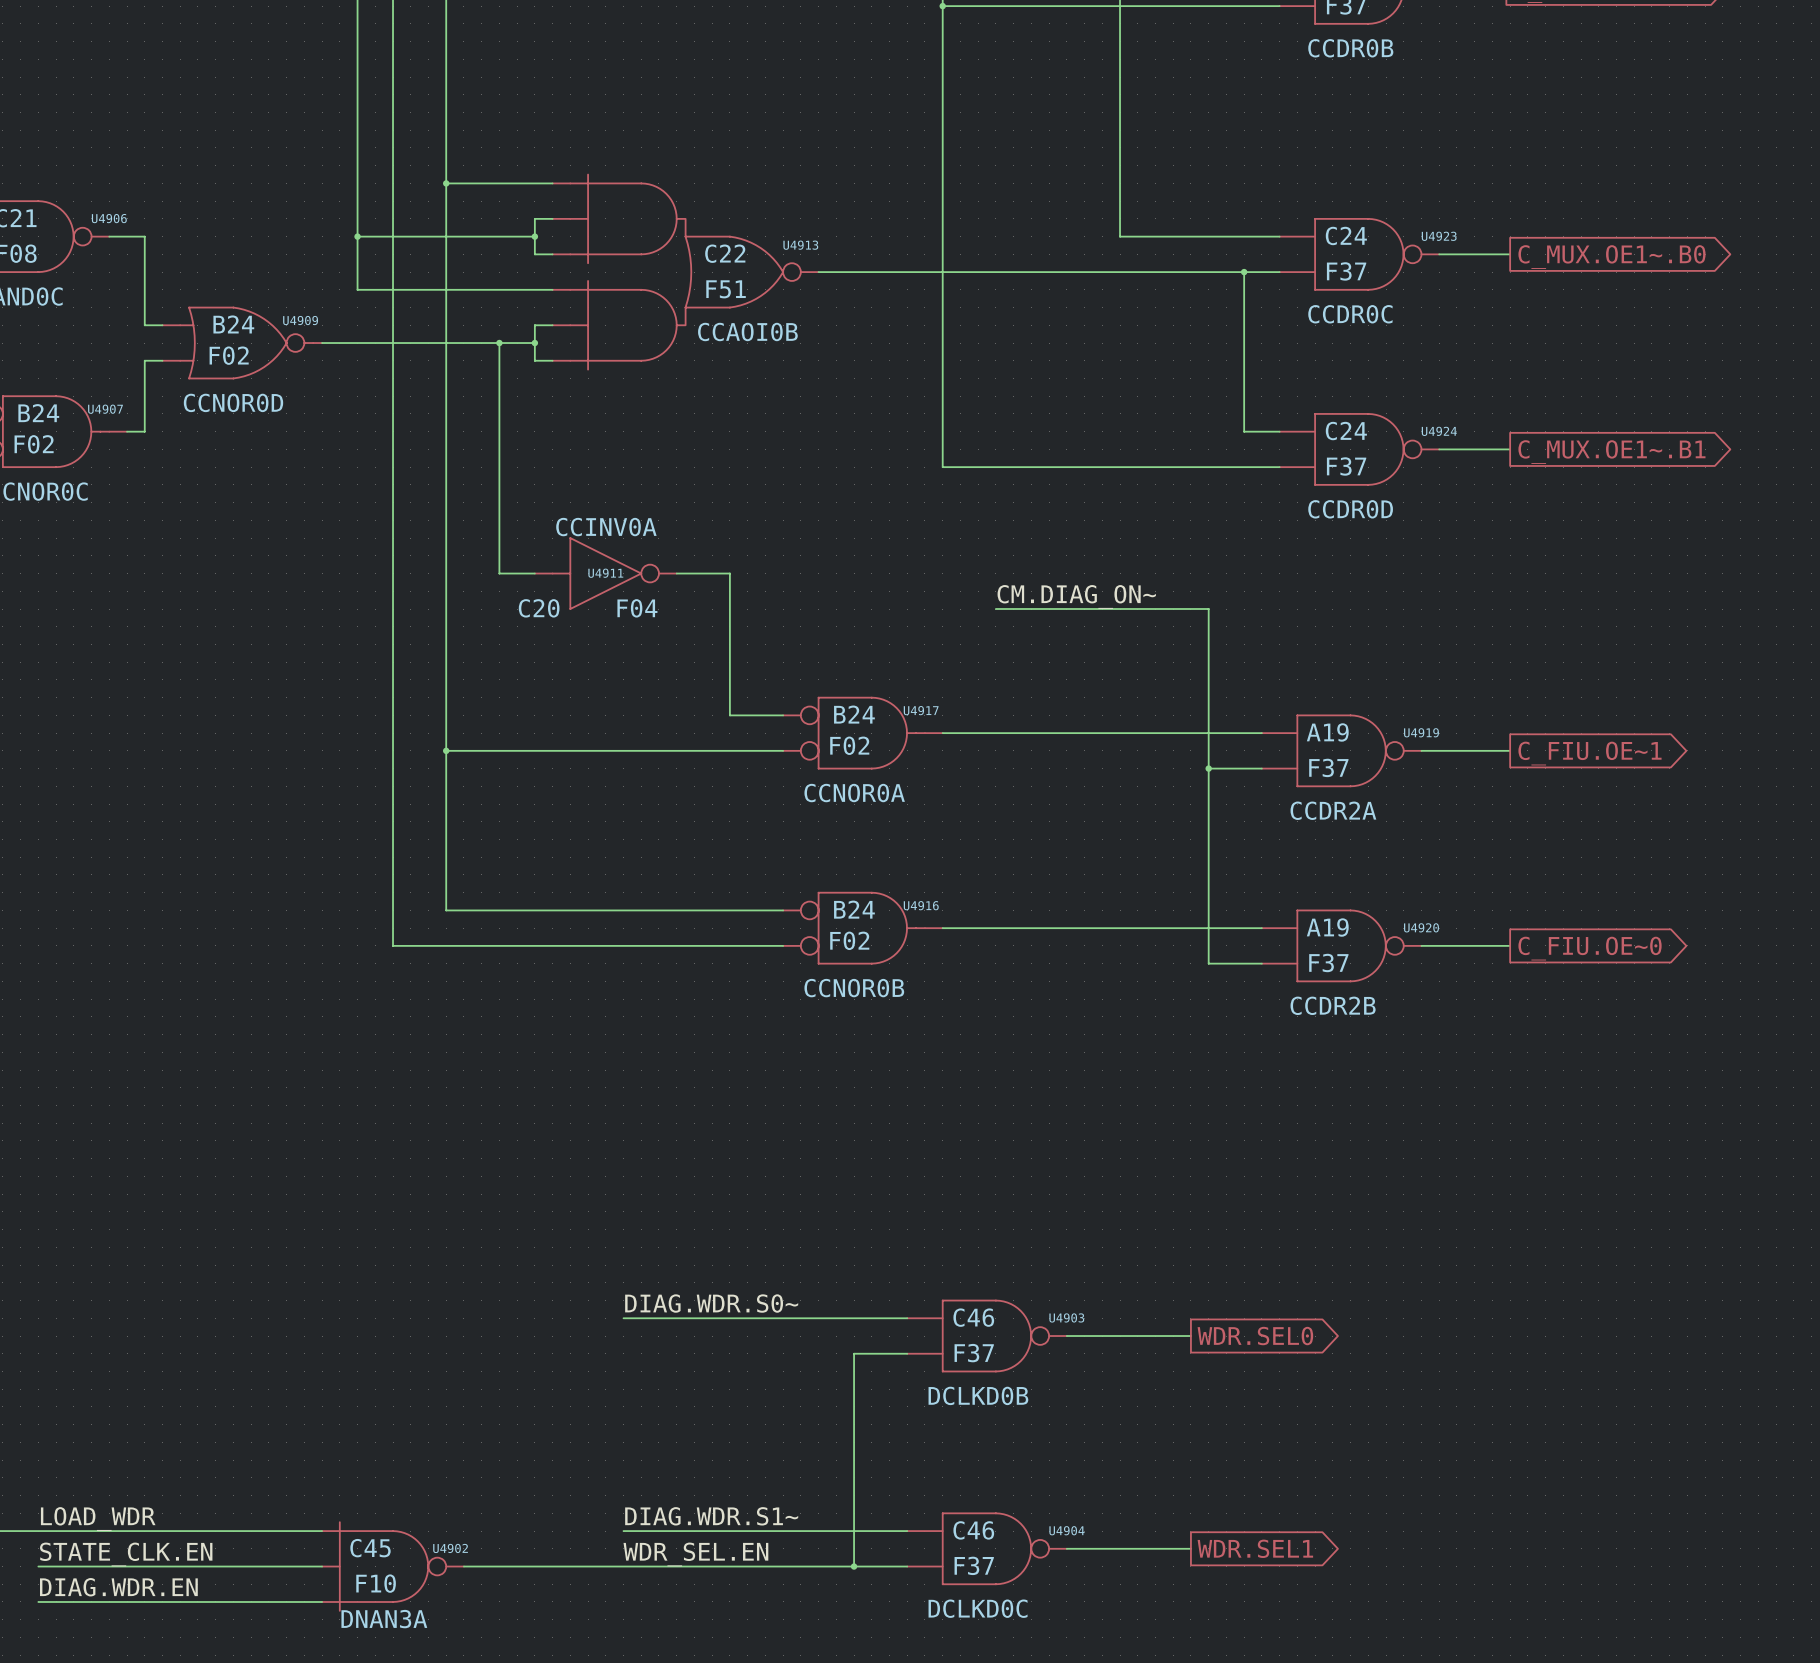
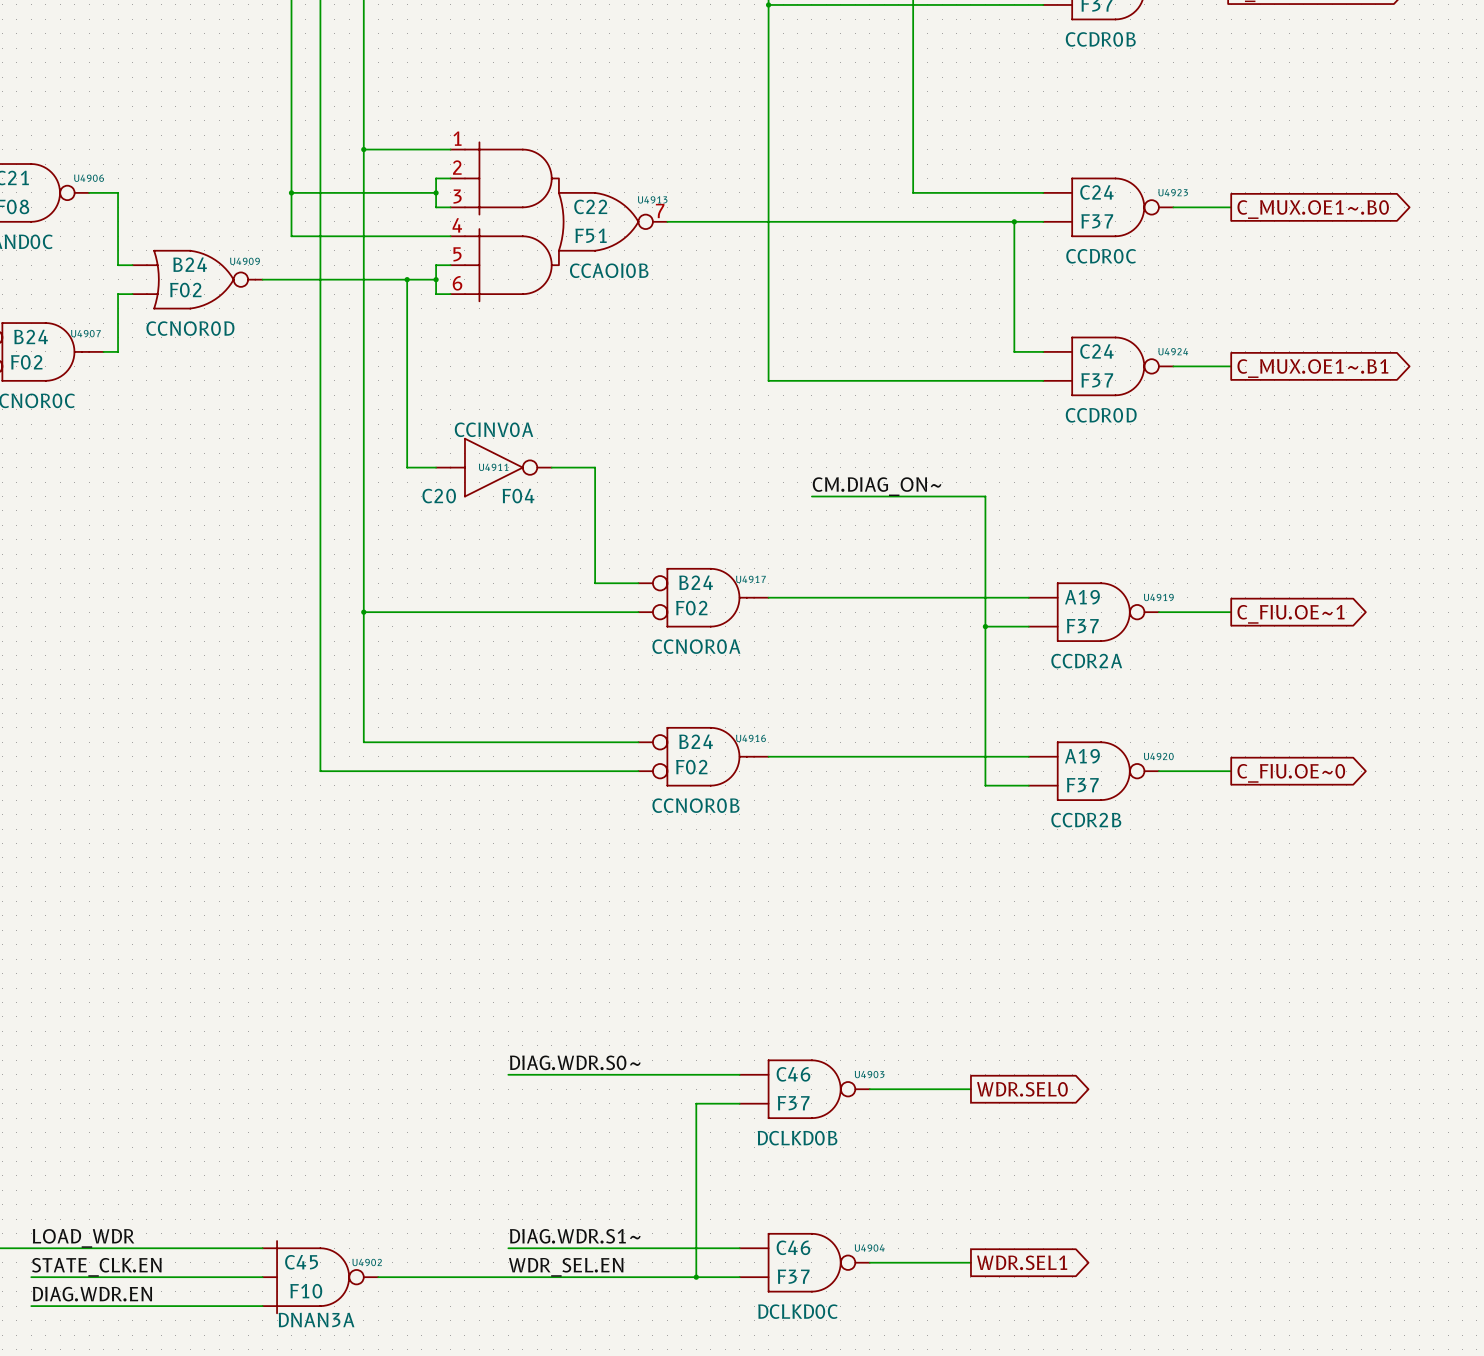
U4913 pin number: none -> 1 (457, 138)
U4913 pin number: none -> 2 (457, 167)
U4913 pin number: none -> 3 (457, 196)
U4913 pin number: none -> 7 (660, 211)
U4913 pin number: none -> 4 (457, 225)
U4913 pin number: none -> 5 (457, 254)
U4913 pin number: none -> 6 (457, 283)

